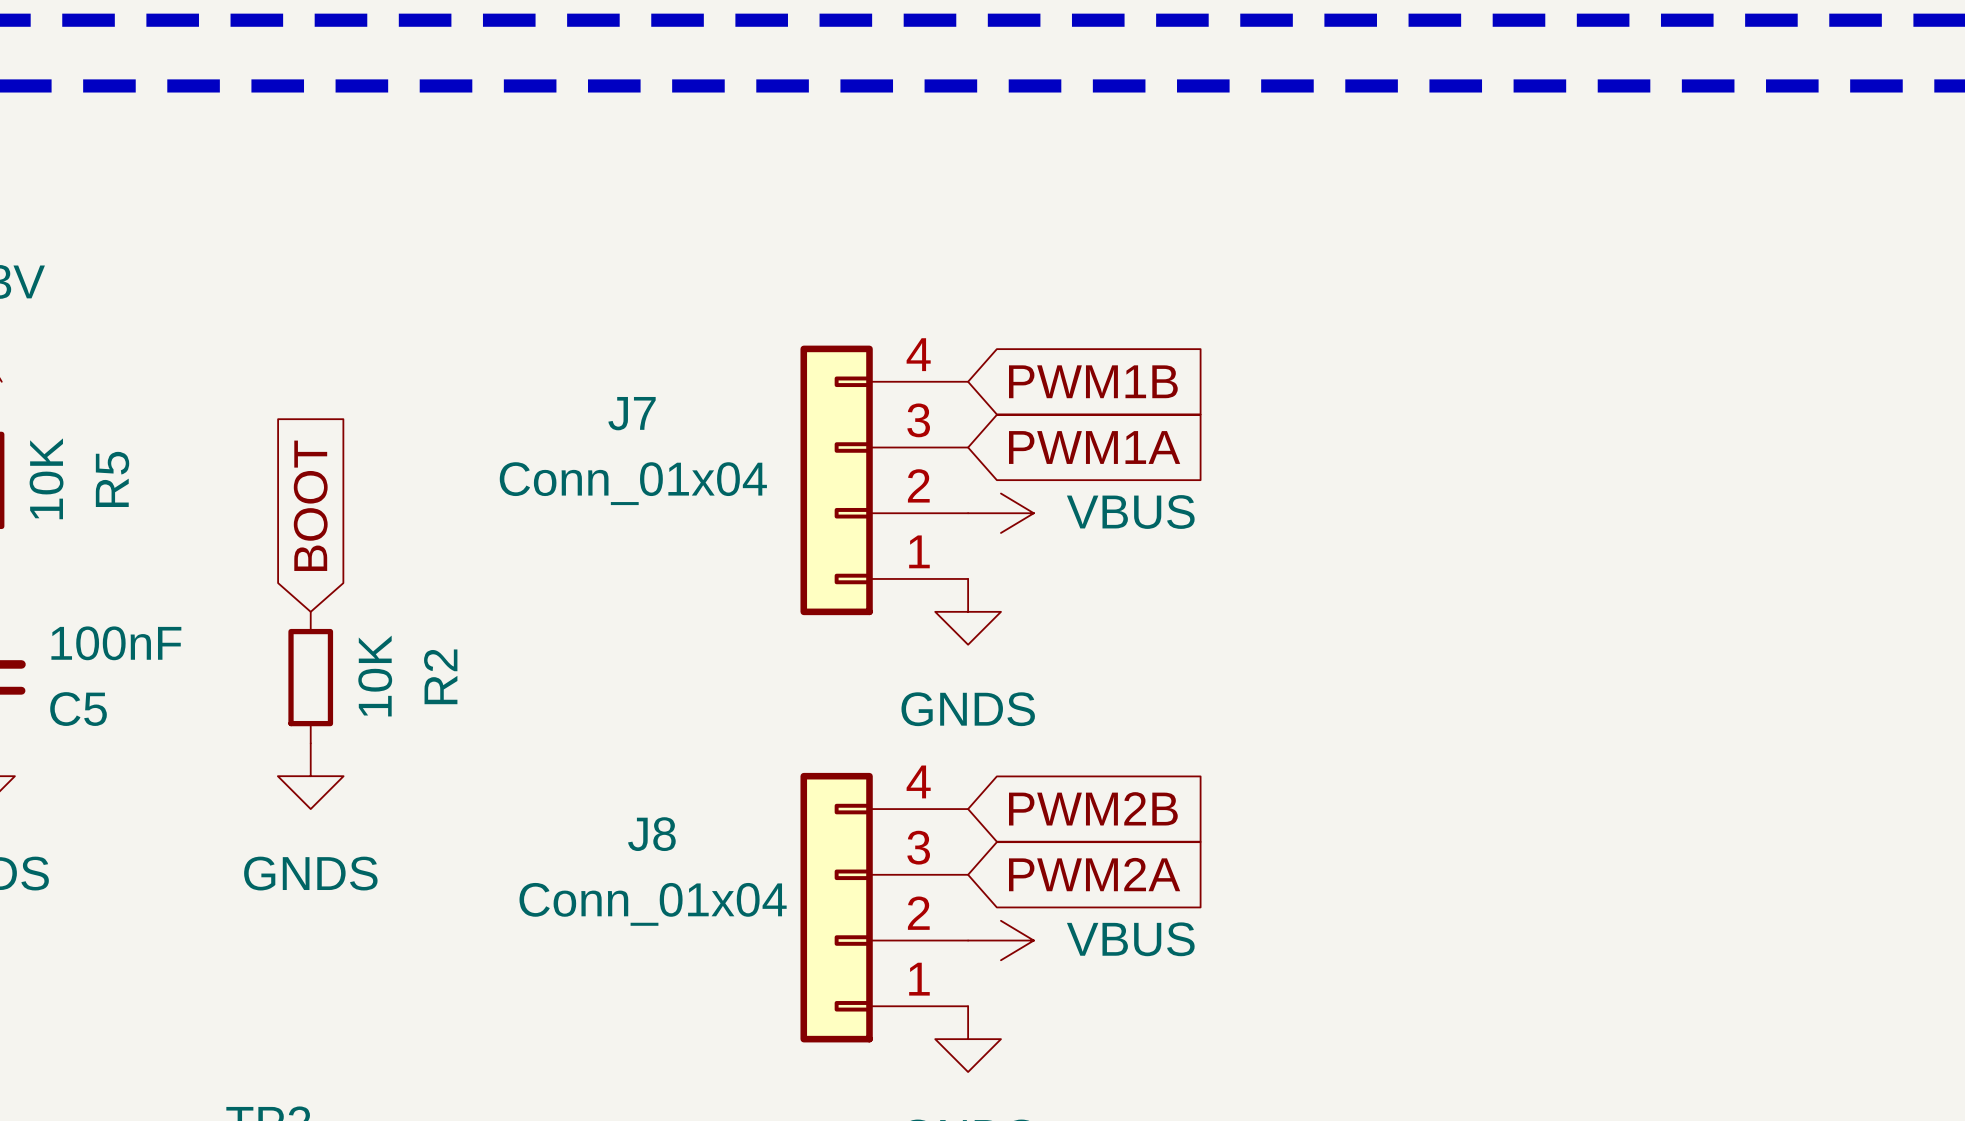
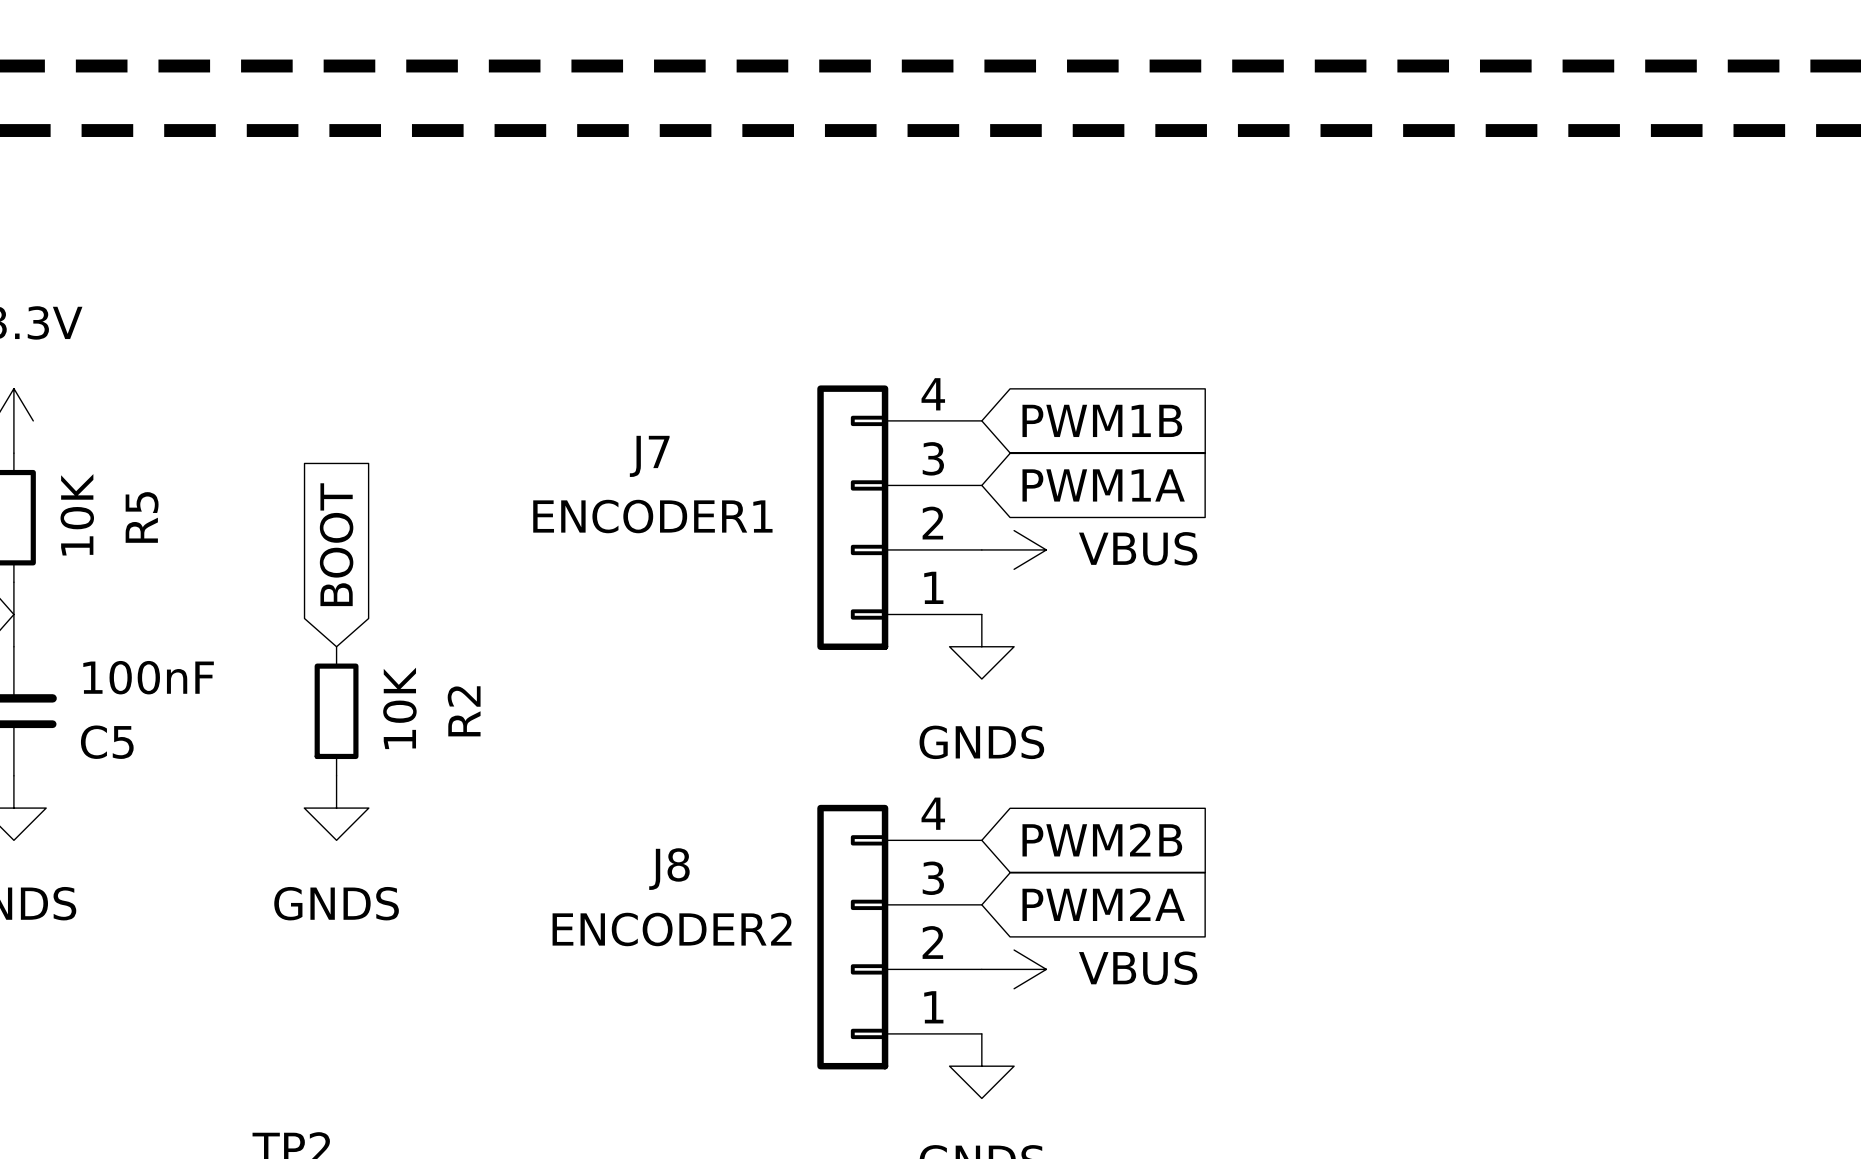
J7 value: Conn_01x04 (633, 483) -> ENCODER1 (652, 516)
J8 value: Conn_01x04 (653, 904) -> ENCODER2 (672, 929)

